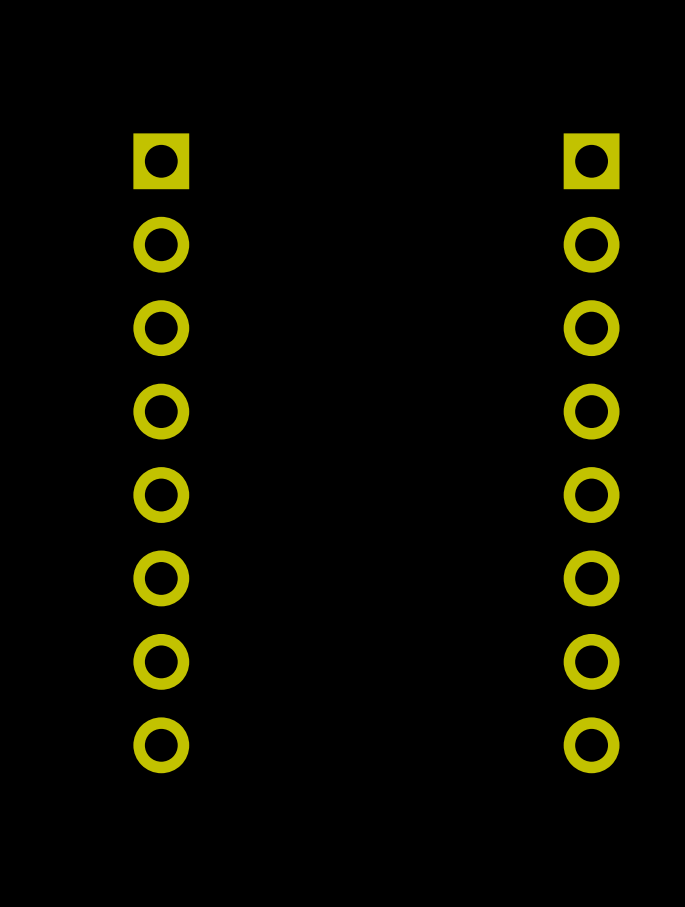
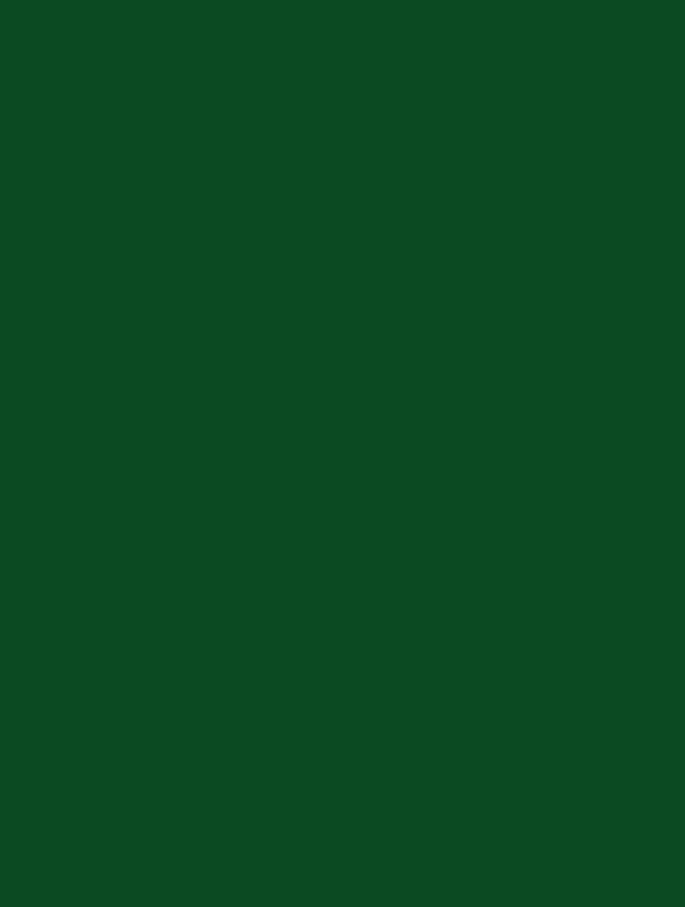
part: (161, 453) -> none
part: (591, 453) -> none

